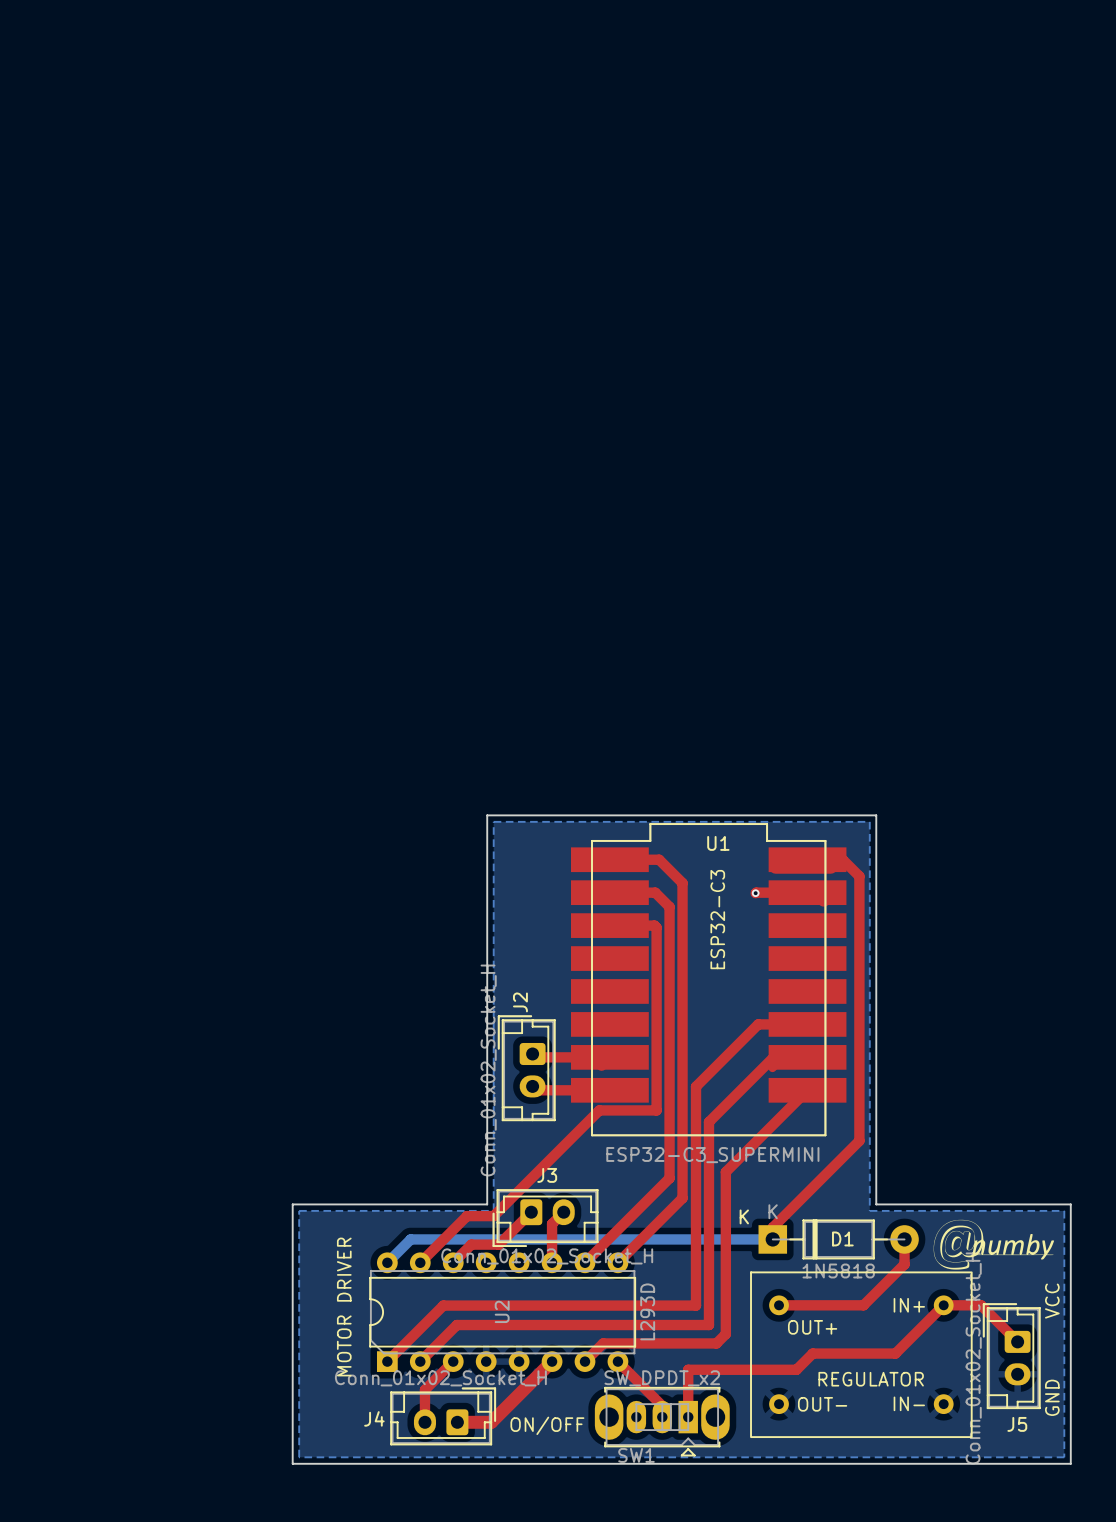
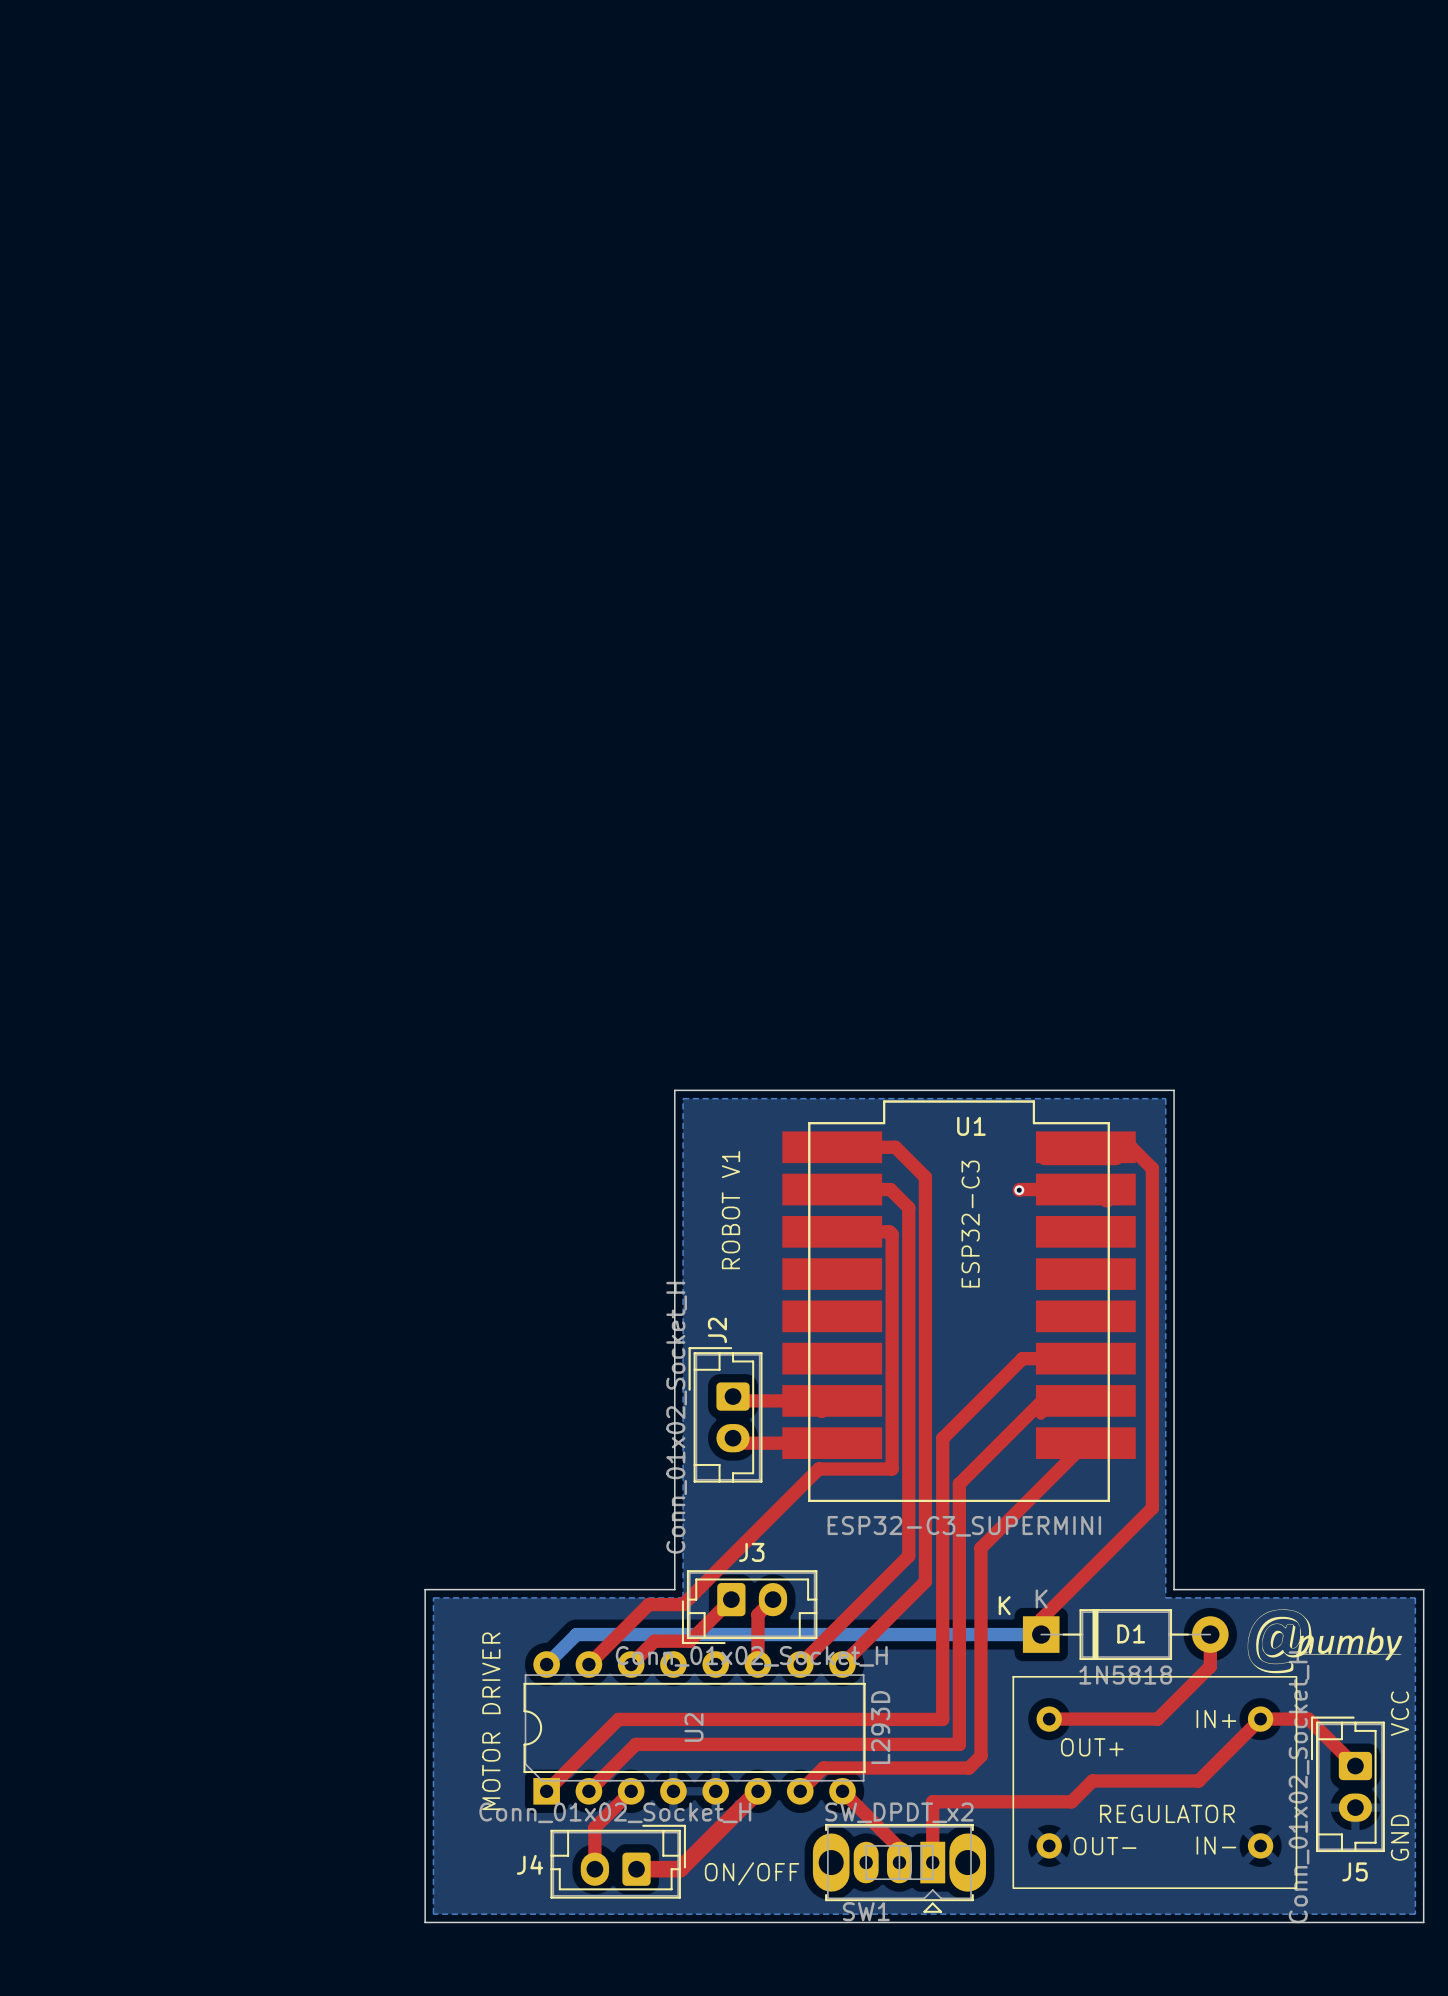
text: none -> ROBOT V1 (730, 1210)

